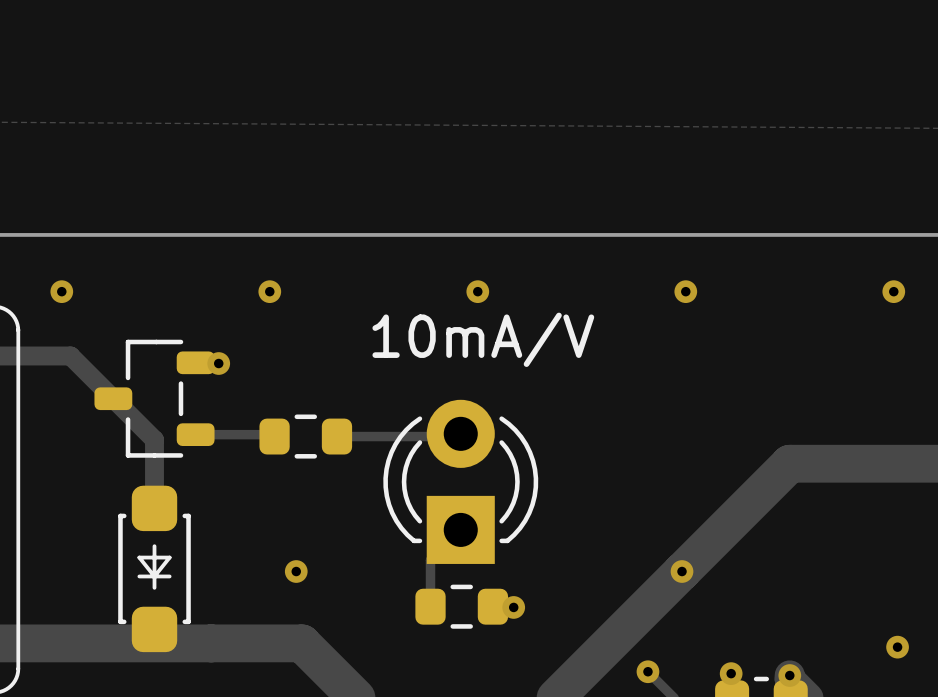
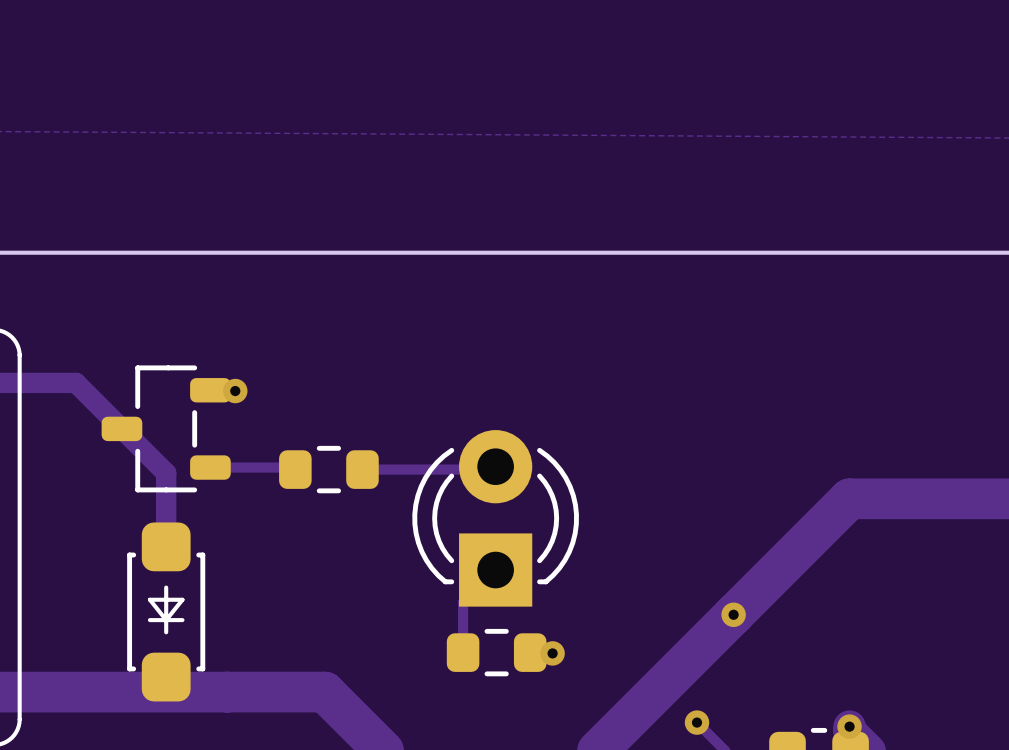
via: (61, 291) -> none
via: (269, 291) -> none
via: (477, 291) -> none
via: (685, 291) -> none
via: (893, 291) -> none
text: 10mA/V (483, 339) -> none
via: (296, 571) -> none
via: (897, 647) -> none
via: (731, 673) -> none

